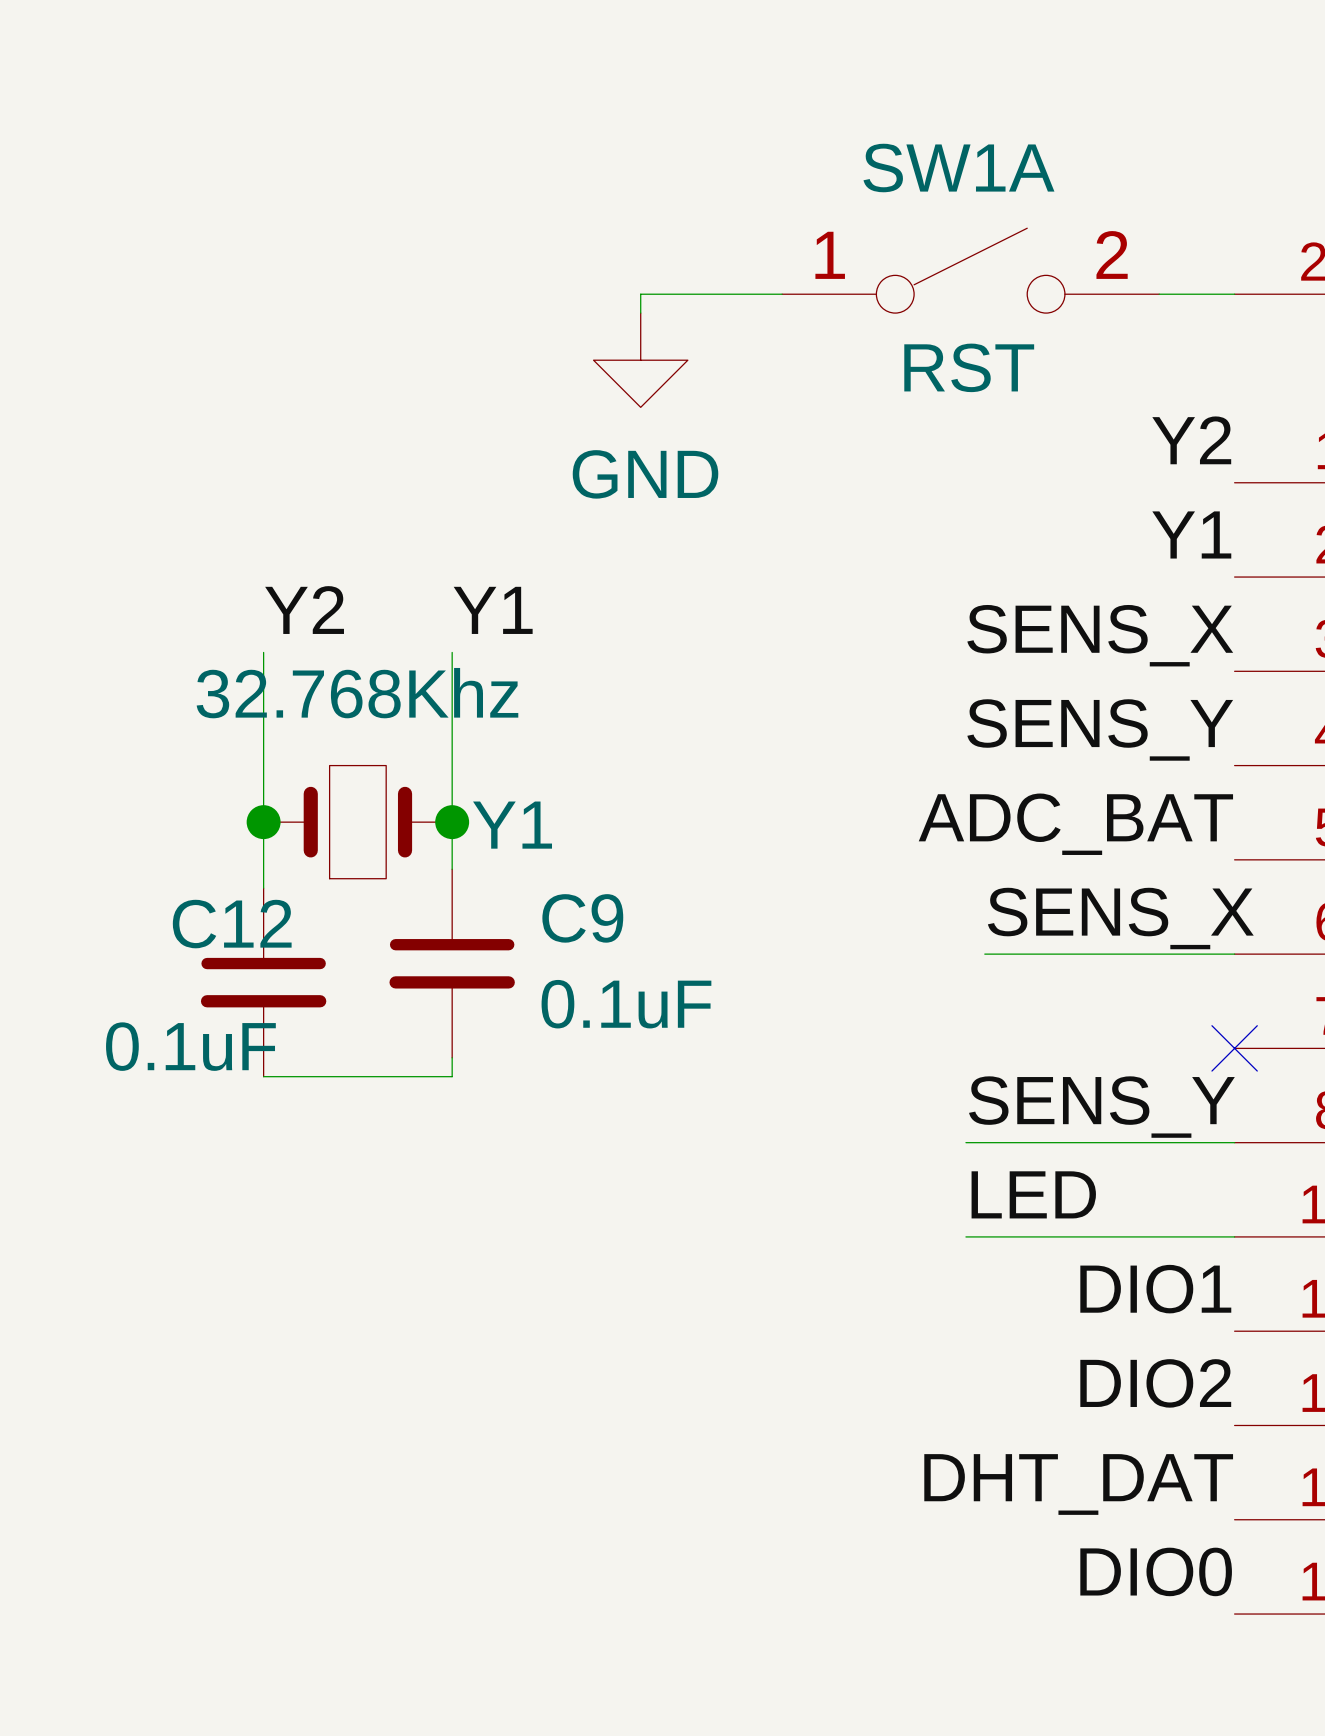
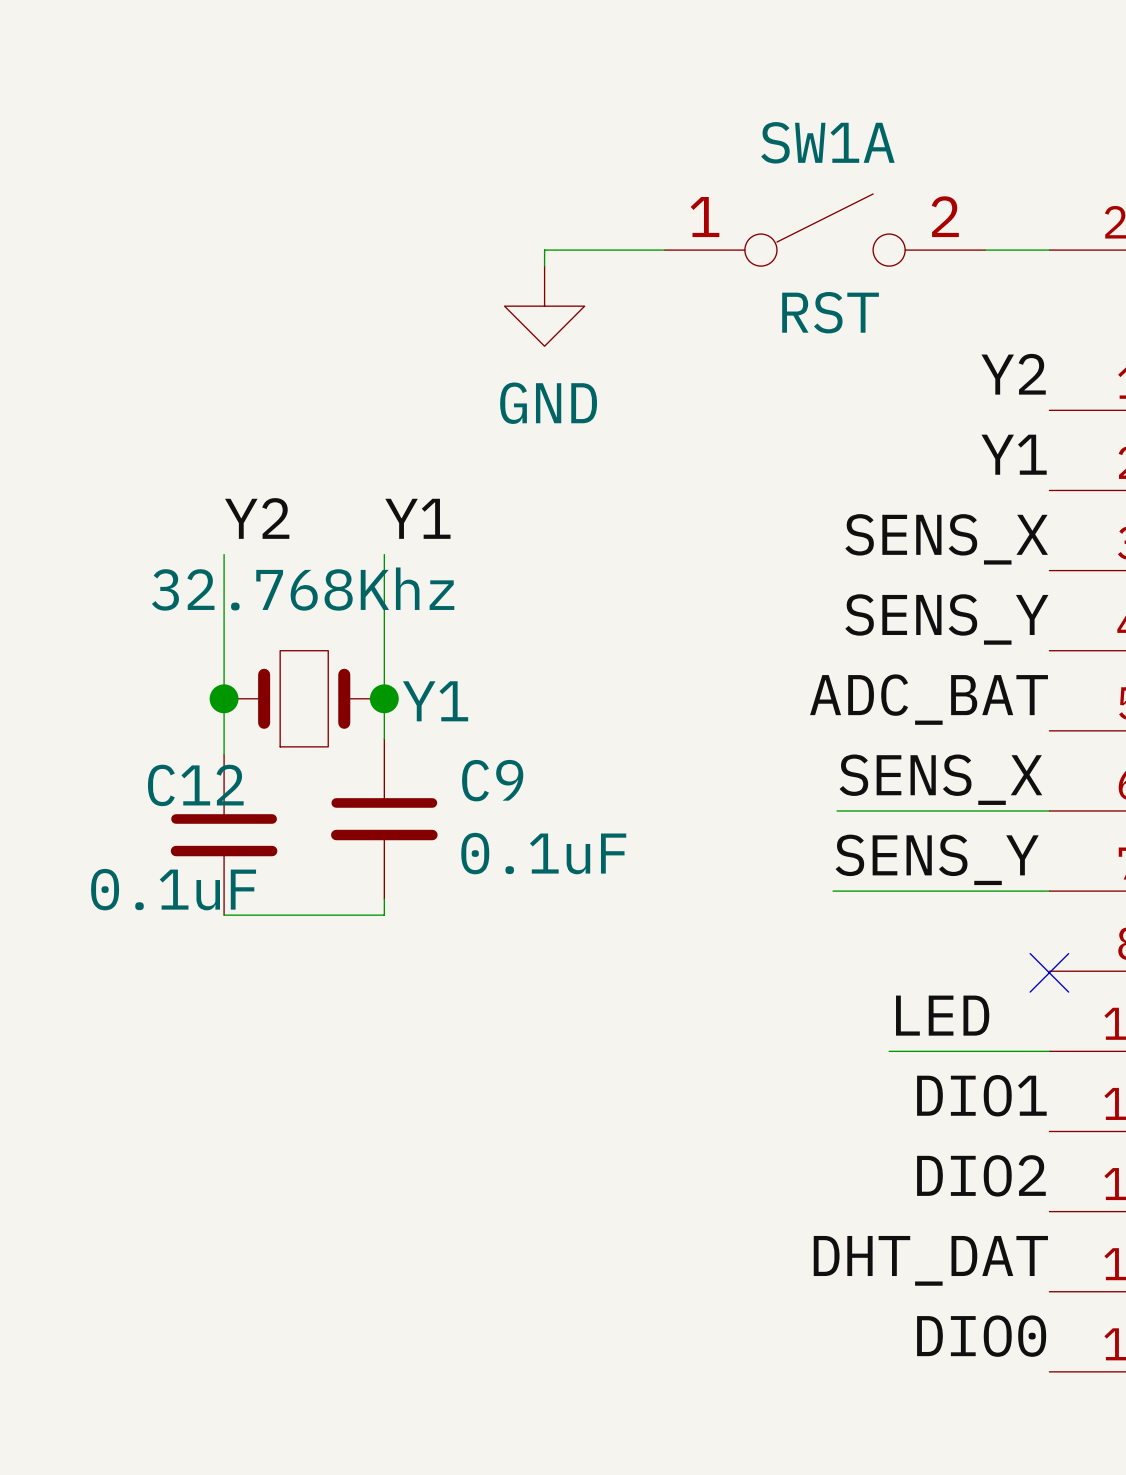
wire: none -> (833, 891) (1049, 891)
no-connect mark position: (1234, 1048) -> (1049, 972)
label position: SENS_Y (1101, 1107) -> SENS_Y (937, 859)
wire: (965, 1142) (1234, 1142) -> none
label position: LED (1033, 1194) -> LED (942, 1015)
wire: (965, 1236) (1046, 1236) -> none

